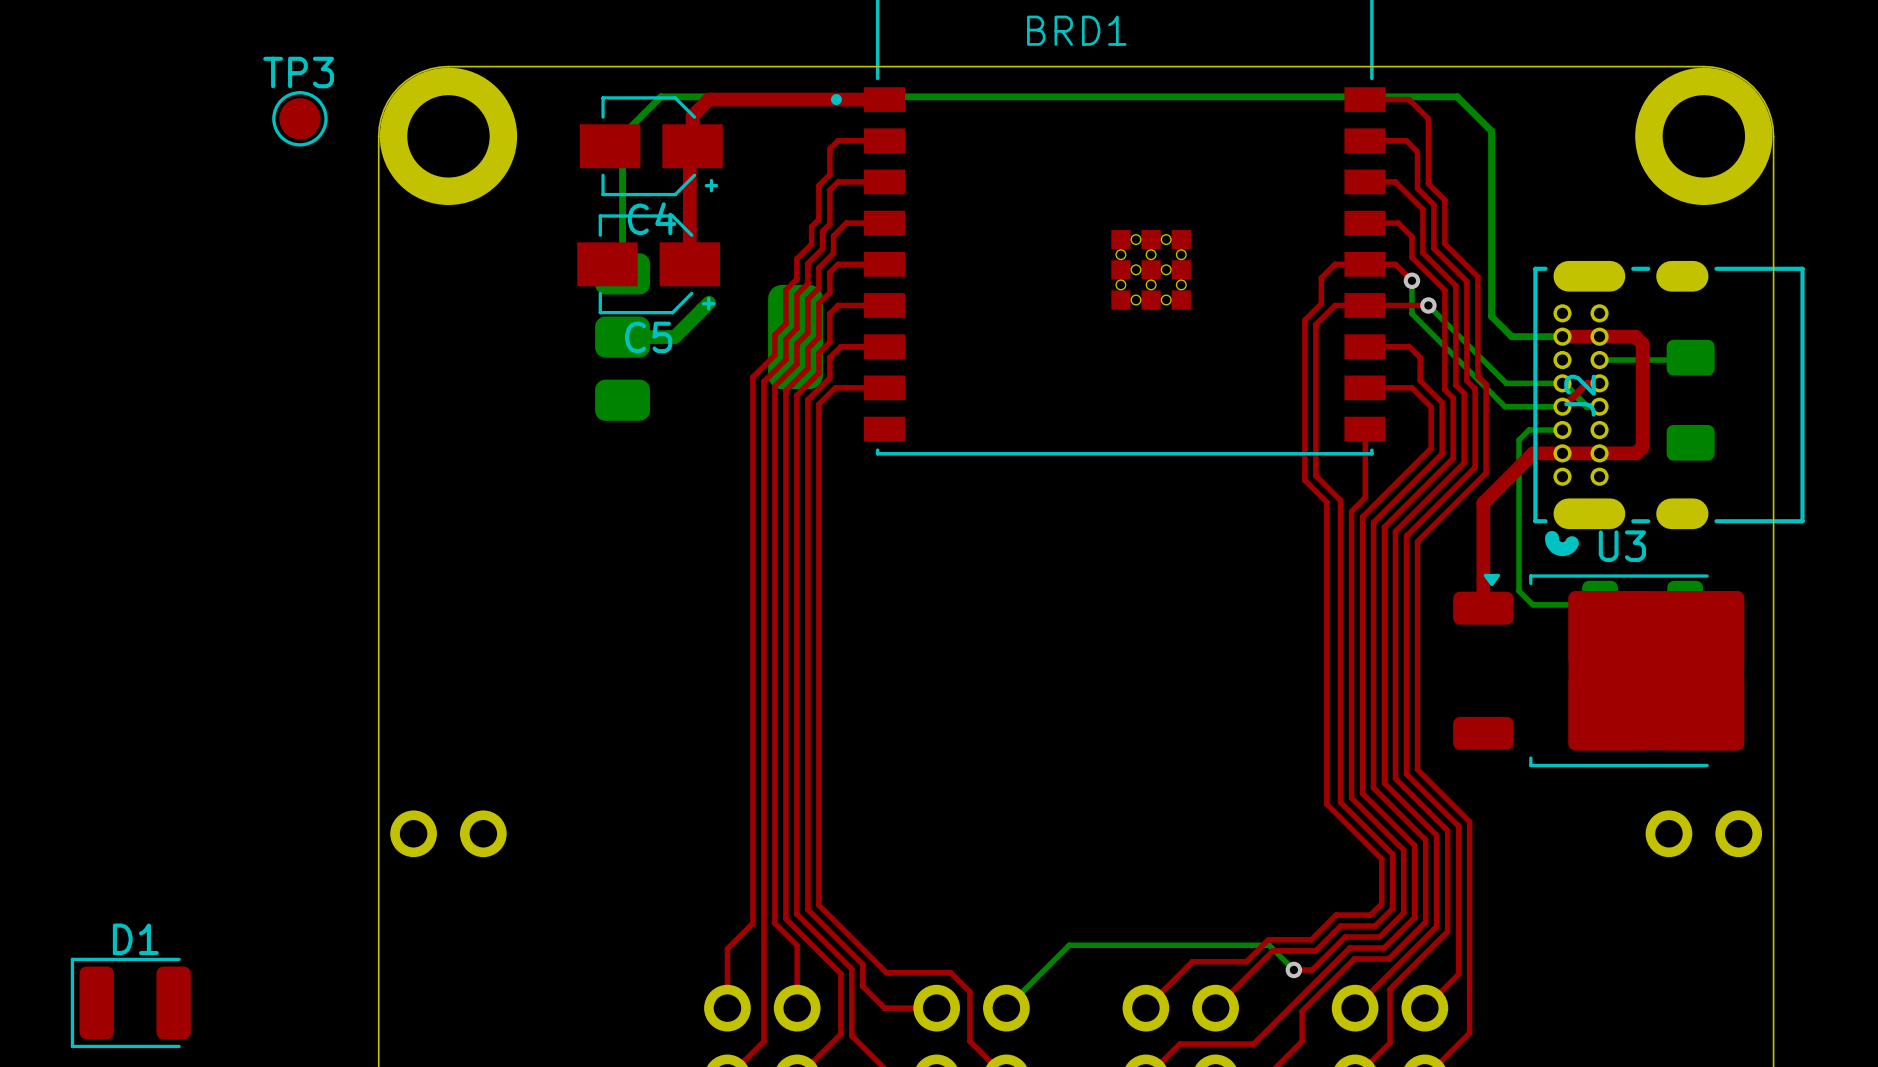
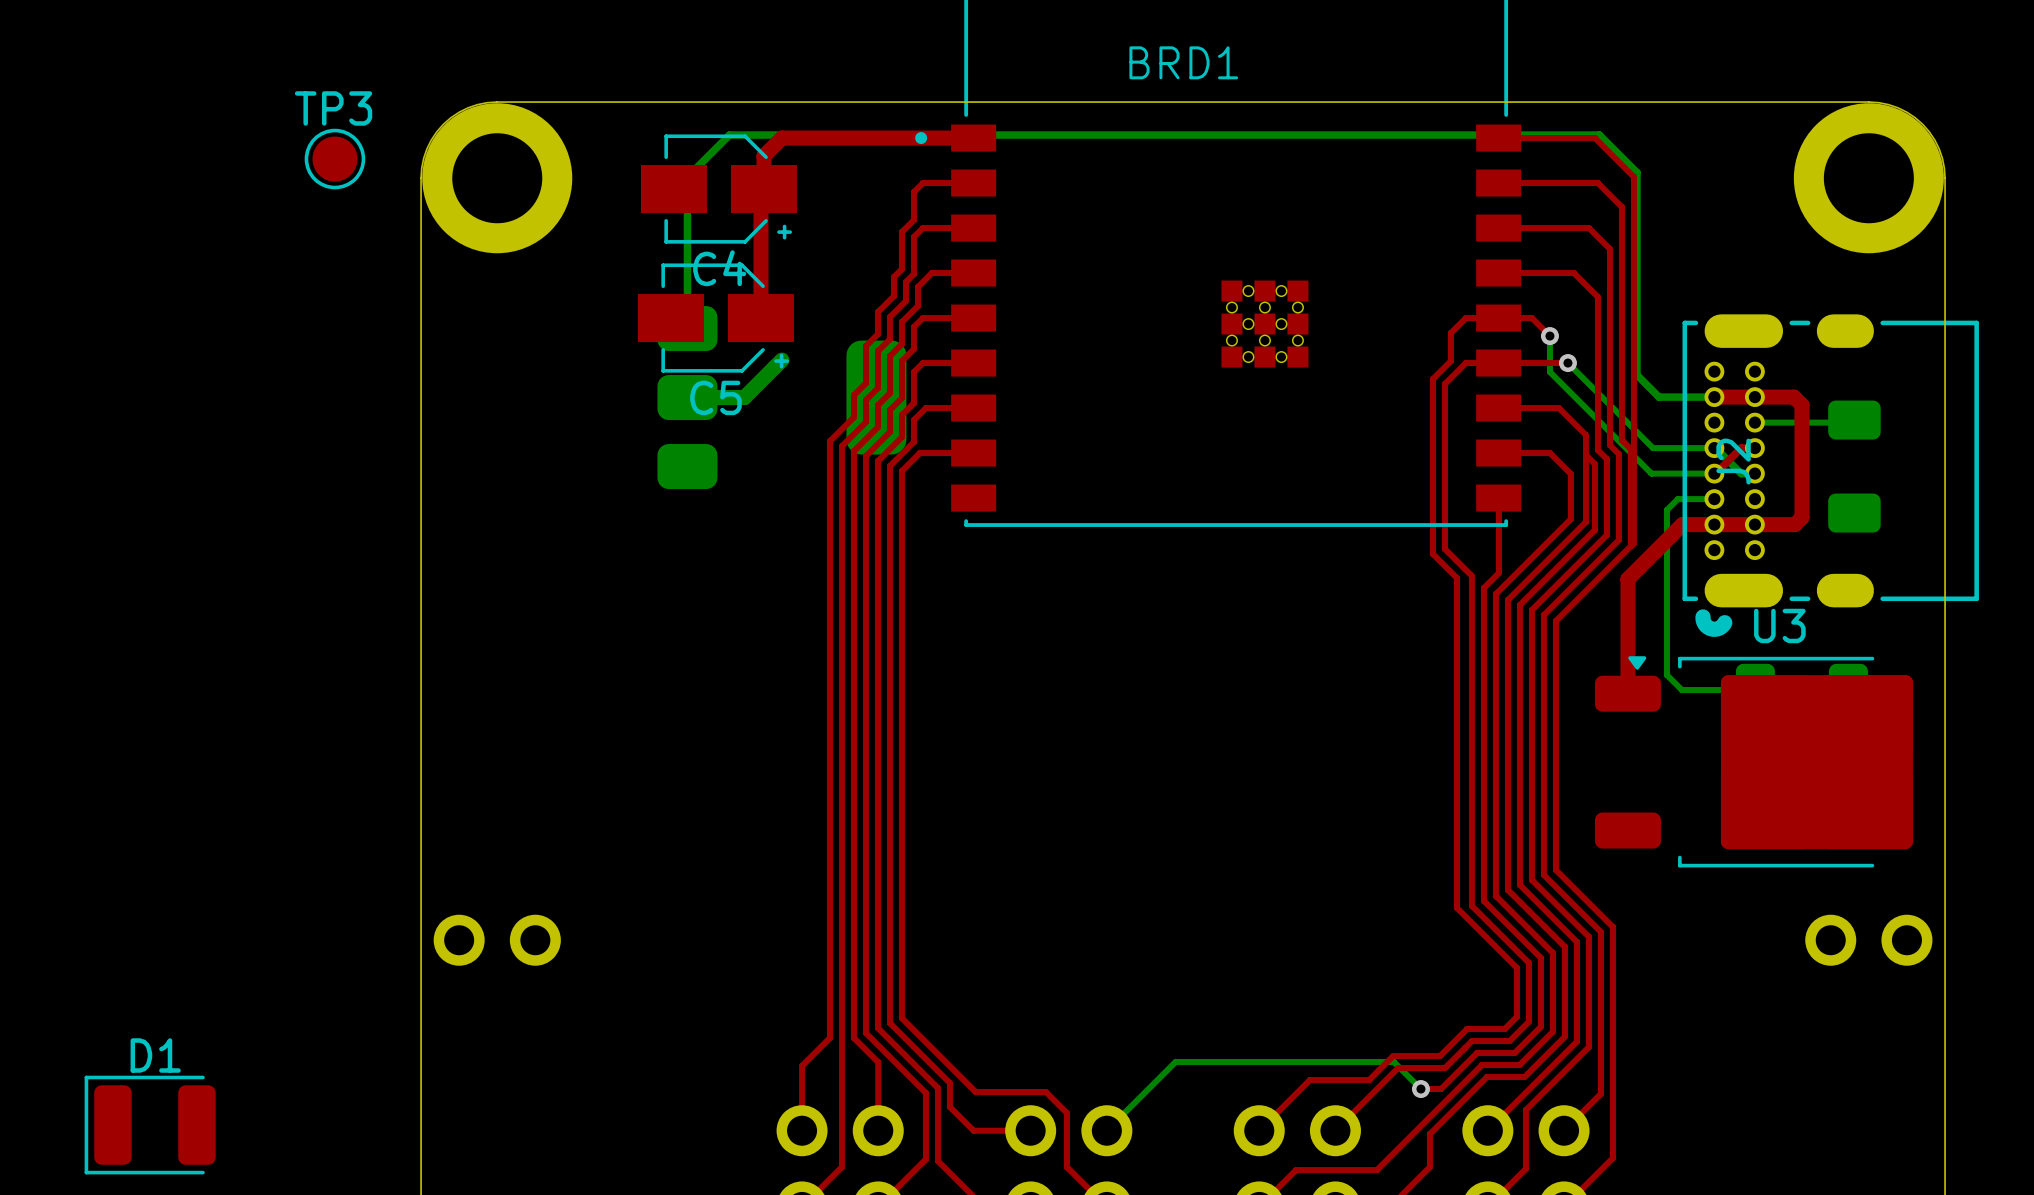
top track: (1409, 99) (1428, 118) (1428, 183) (1444, 200) (1444, 243) (1477, 276) -> (1546, 138) (1594, 138) (1633, 177) (1633, 543) (1630, 546)
top track: (1406, 140) (1417, 151) (1417, 188) (1433, 204) (1433, 248) (1466, 281) -> (1543, 183) (1597, 183) (1621, 207) (1621, 331)
top track: (1395, 181) (1422, 209) (1422, 252) (1455, 285) -> (1531, 228) (1588, 228) (1609, 249) (1609, 336)
top track: (1398, 223) (1411, 236) (1411, 257) (1444, 290) (1444, 371) -> (1534, 273) (1573, 273) (1597, 297) (1597, 341)
top track: (1409, 346) (1420, 357) (1420, 380) (1442, 402) (1442, 453) -> (1585, 455) (1585, 522) (1582, 525)
top track: none -> (1546, 408) (1558, 408) (1585, 435)

